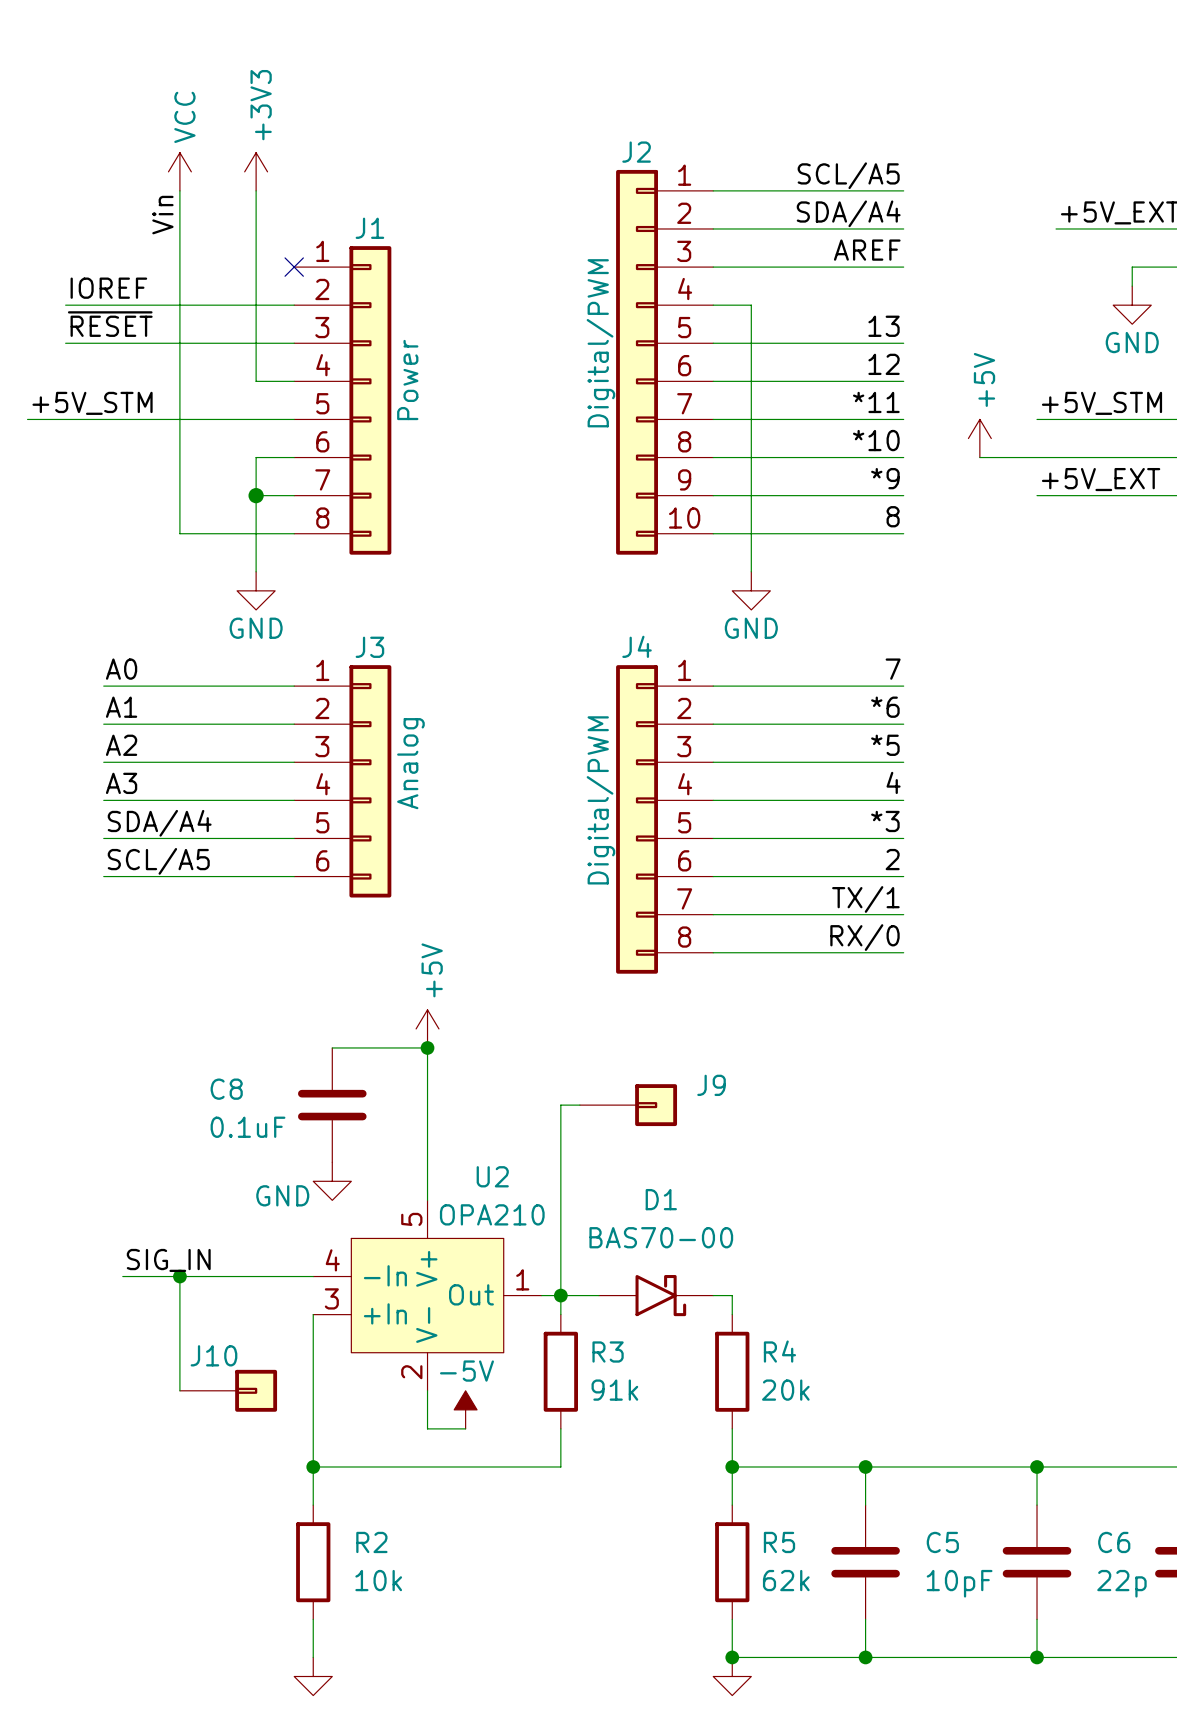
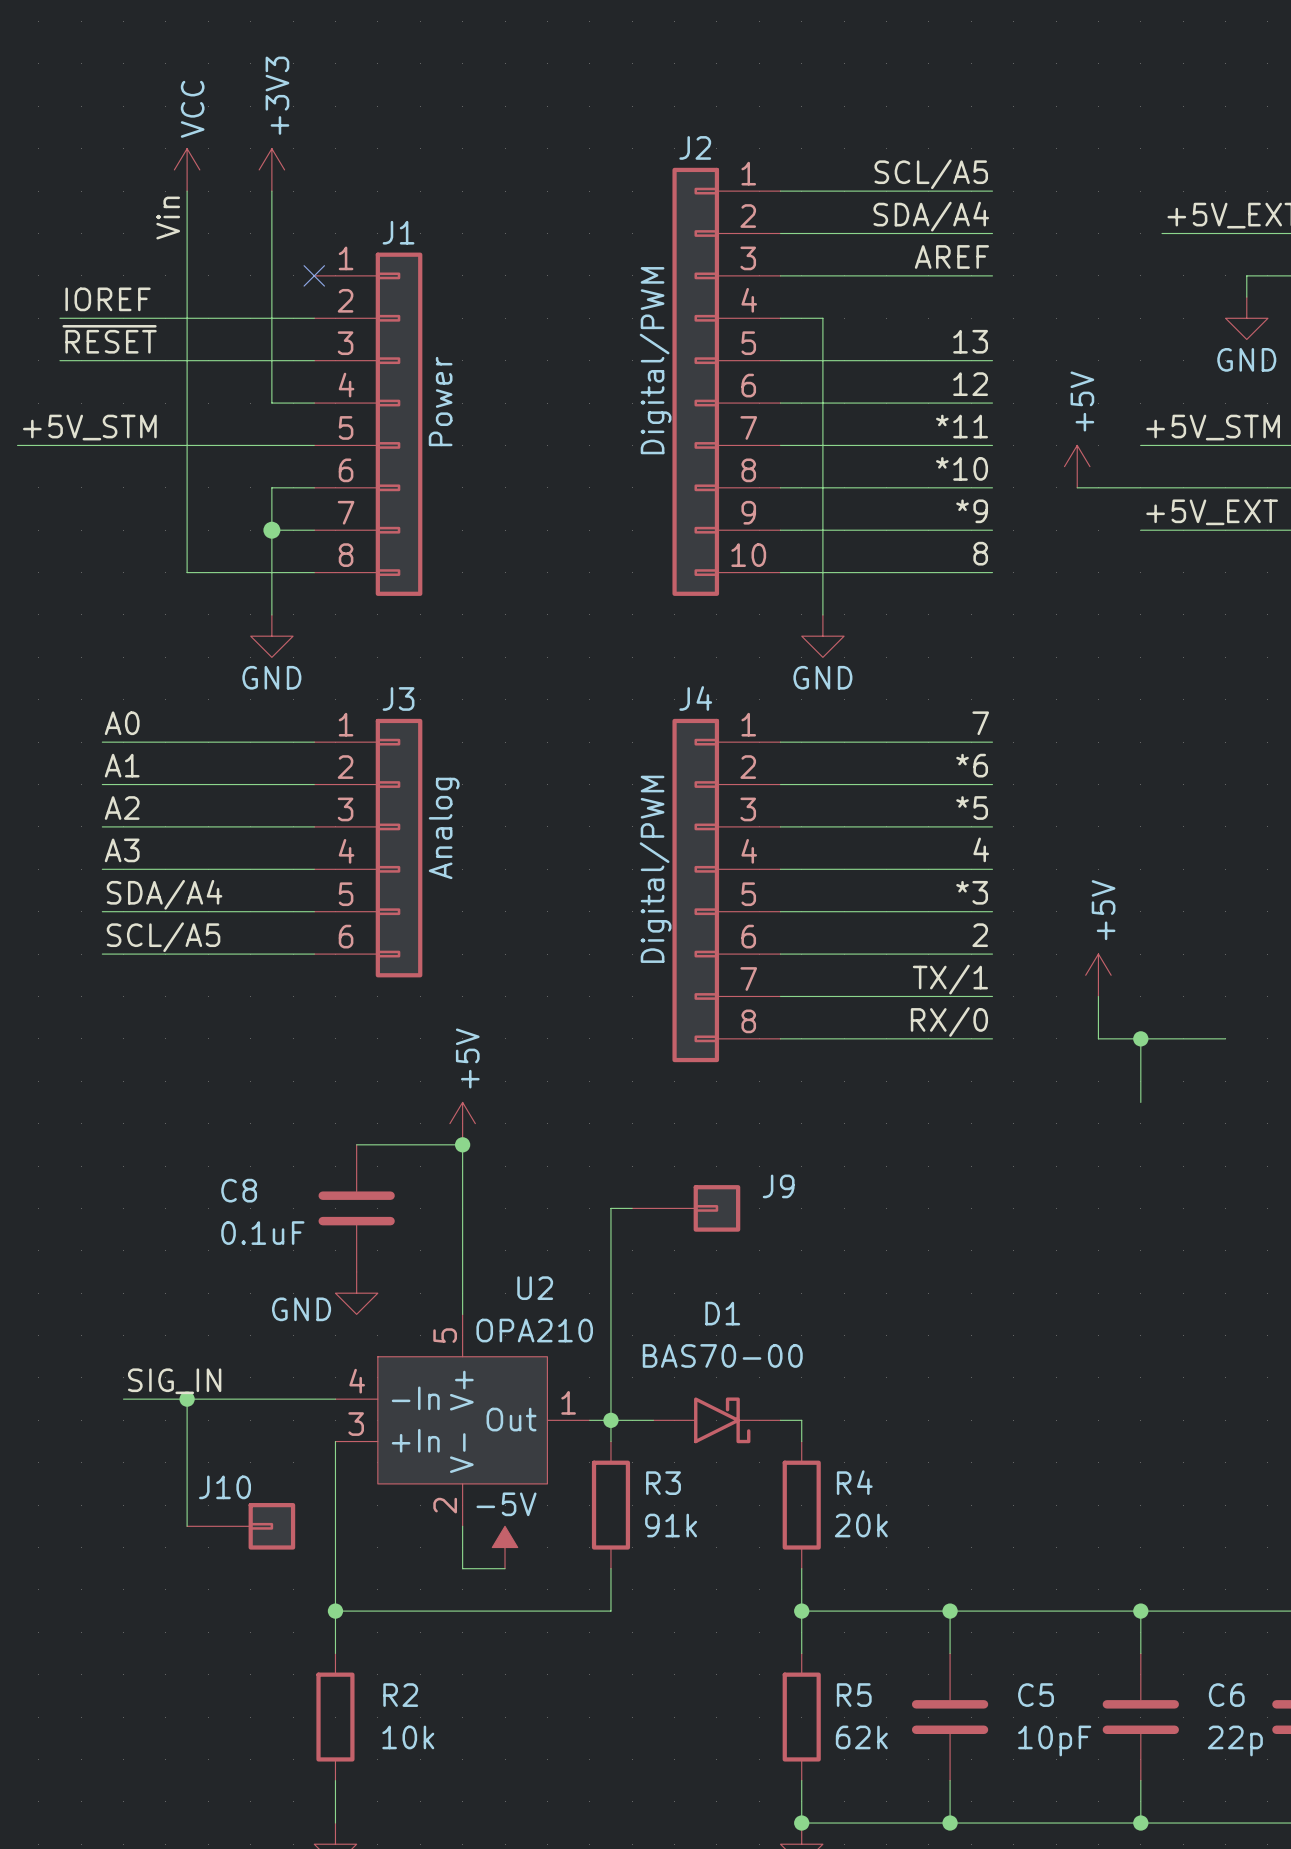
power symbol: none -> +5V (1098, 975)
wire: none -> (1098, 996) (1098, 1038) (1225, 1038)
wire: none -> (1140, 1038) (1140, 1102)
junction: none -> (1140, 1038)

